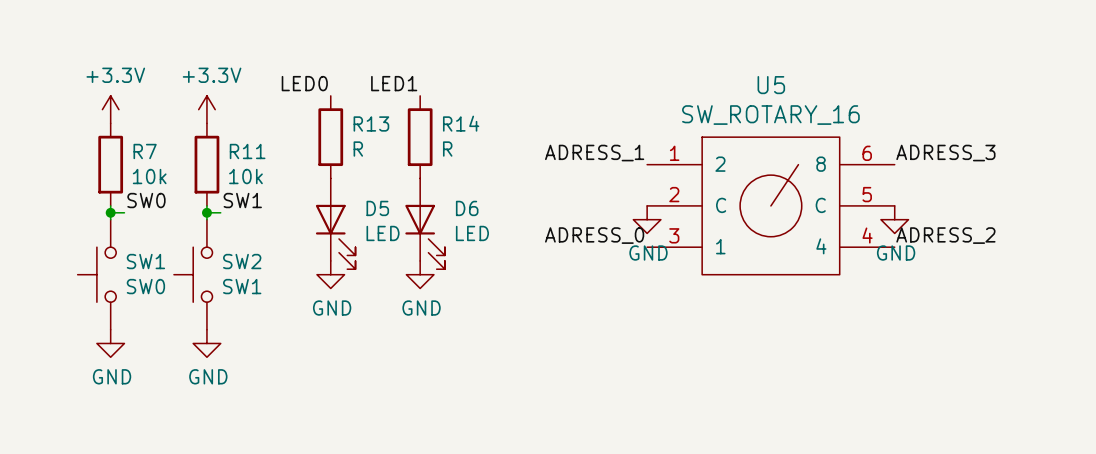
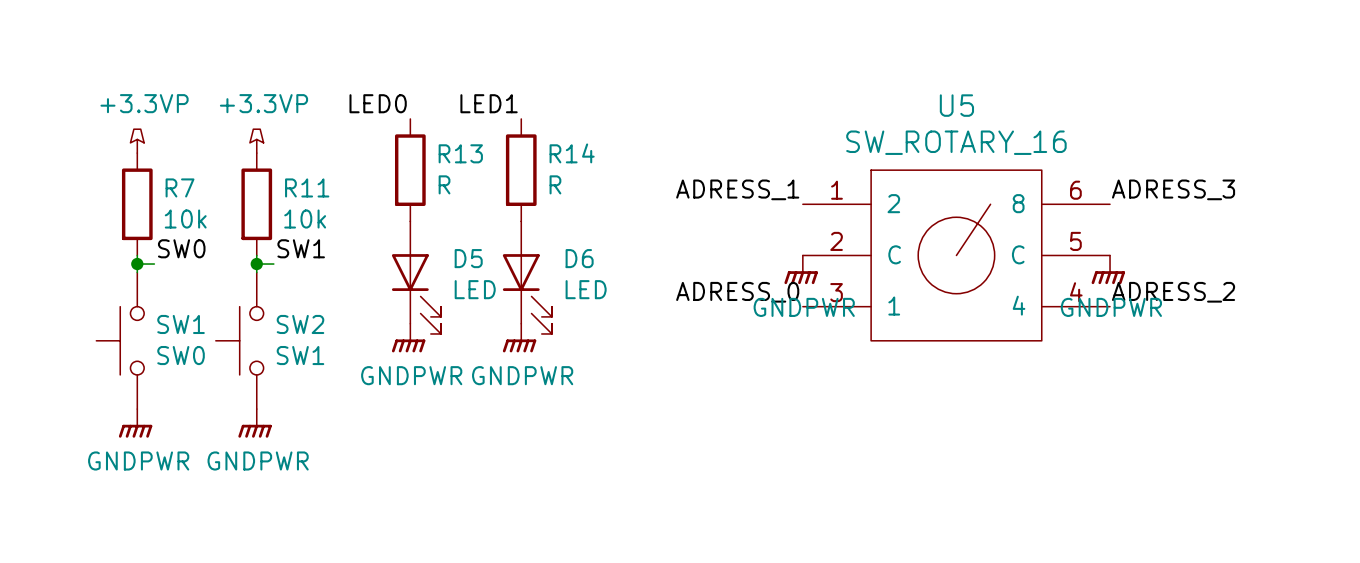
power symbol: +3.3V (110, 109) -> +3.3VP (137, 141)
power symbol: +3.3V (206, 109) -> +3.3VP (256, 141)
power symbol: GND (647, 219) -> GNDPWR (801, 269)
power symbol: GND (894, 219) -> GNDPWR (1108, 269)
power symbol: GND (330, 274) -> GNDPWR (408, 338)
power symbol: GND (420, 274) -> GNDPWR (519, 338)
power symbol: GND (110, 343) -> GNDPWR (135, 423)
power symbol: GND (206, 343) -> GNDPWR (255, 423)

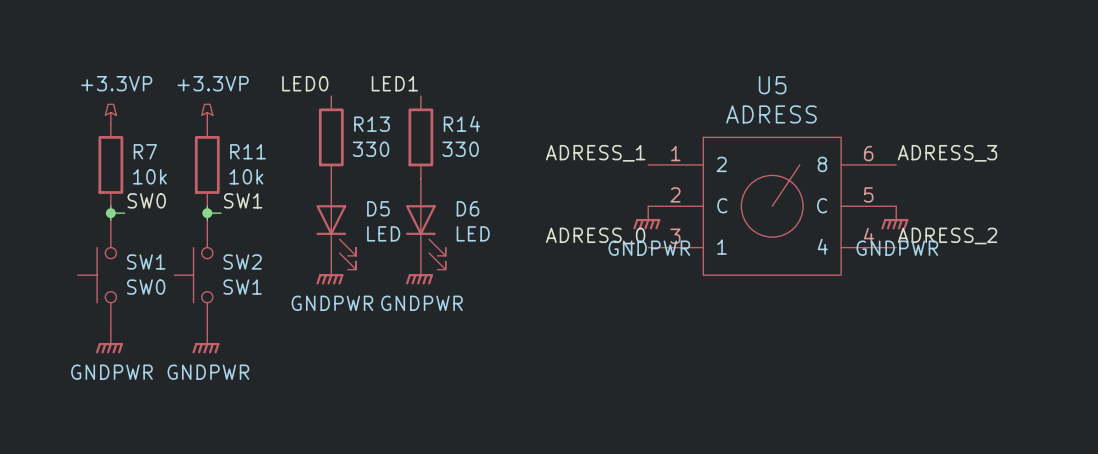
U5 value: SW_ROTARY_16 (956, 142) -> ADRESS (771, 114)
R13 value: R (444, 184) -> 330 (371, 149)
R14 value: R (555, 184) -> 330 (460, 149)

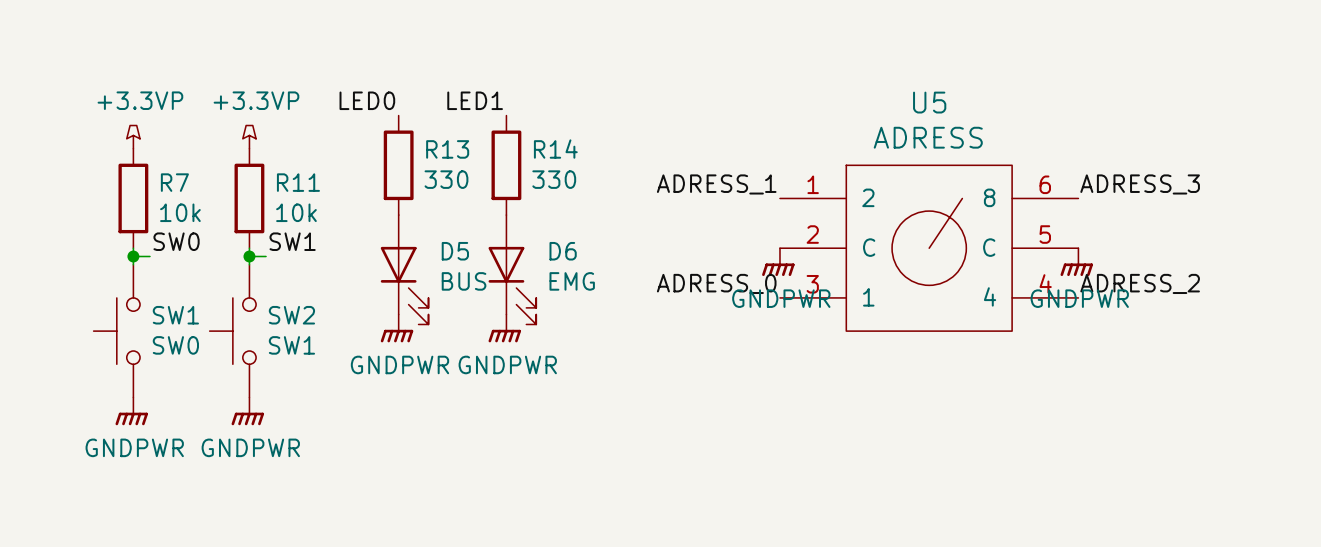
D5 value: LED (383, 233) -> BUS (464, 281)
D6 value: LED (473, 233) -> EMG (572, 281)

